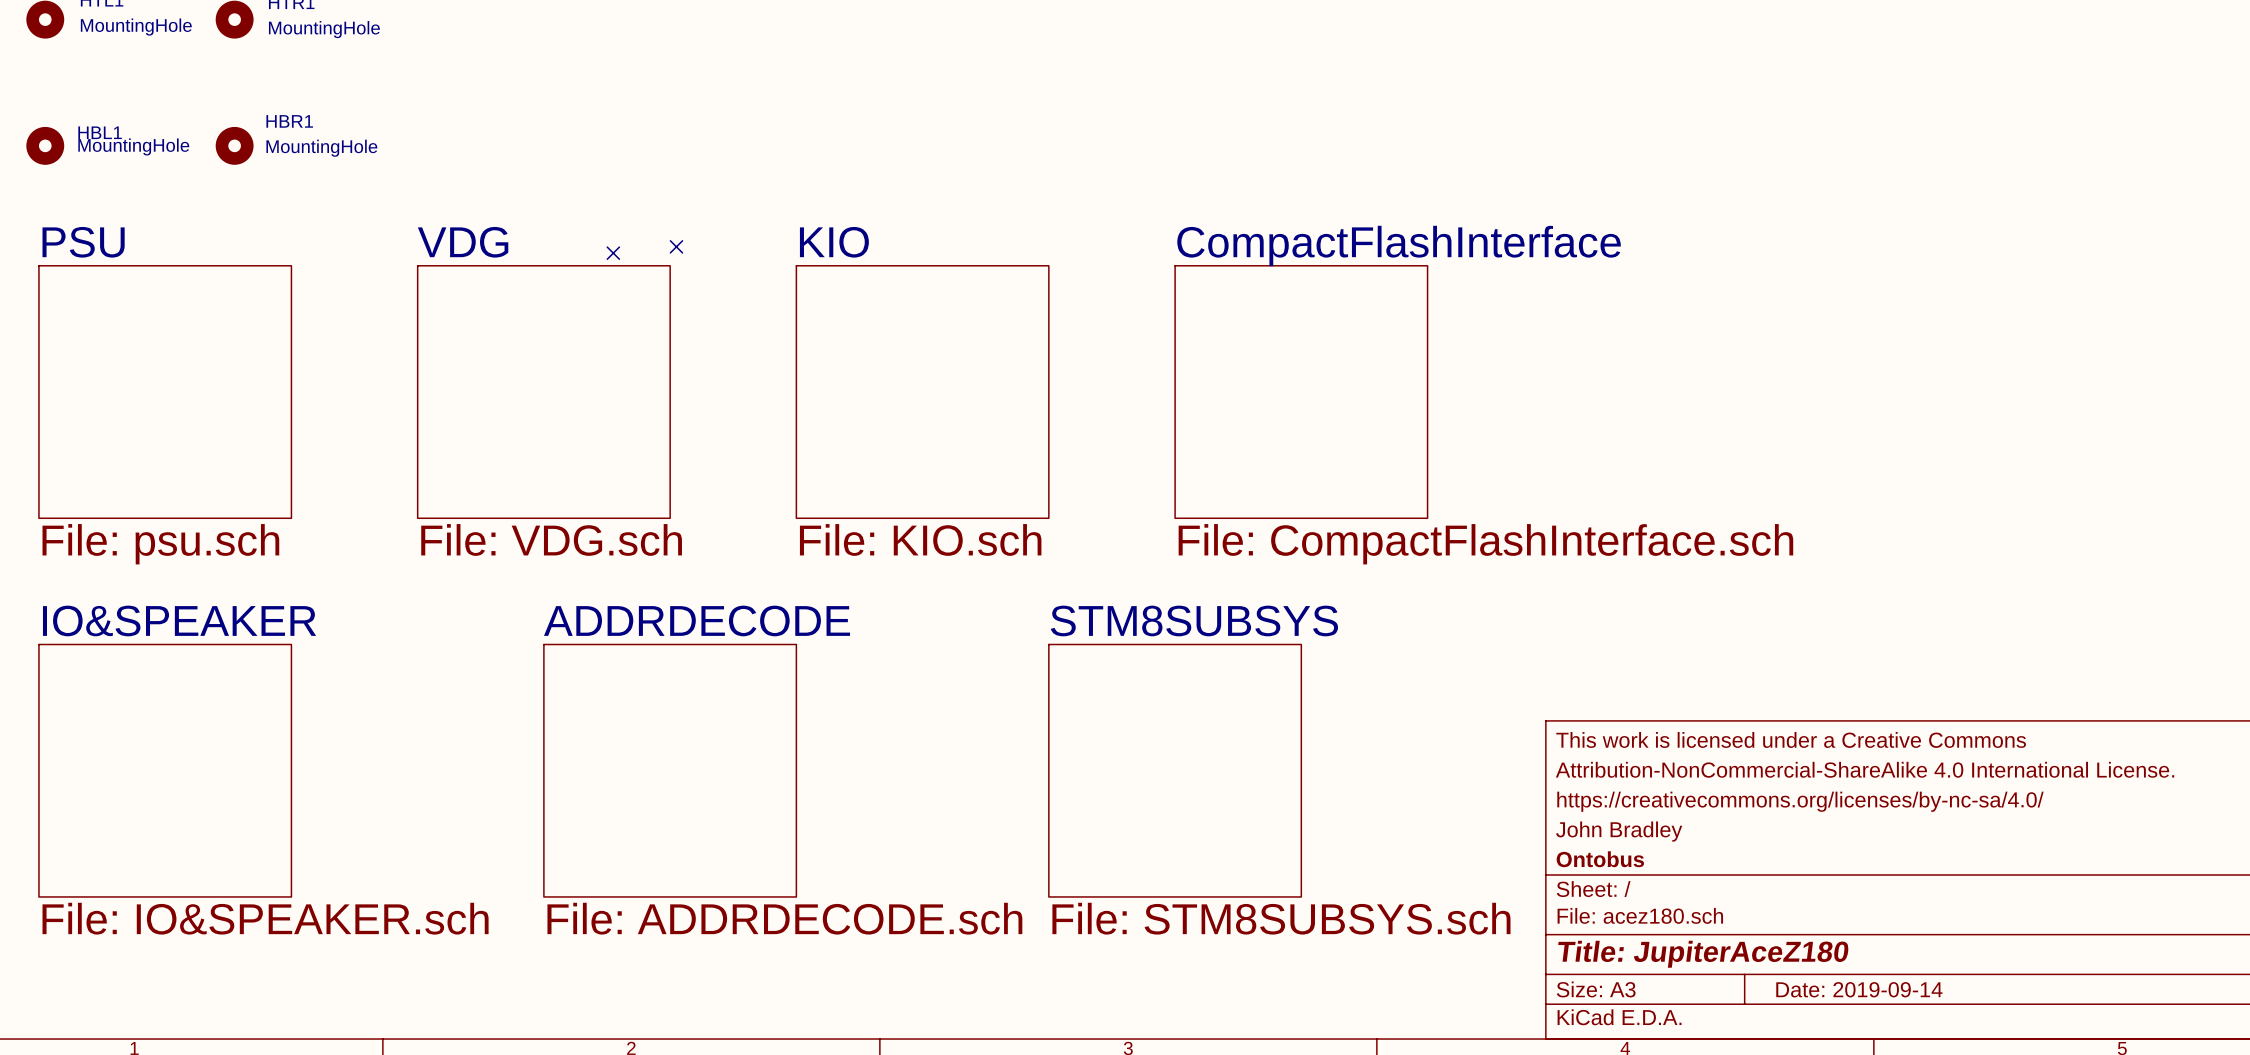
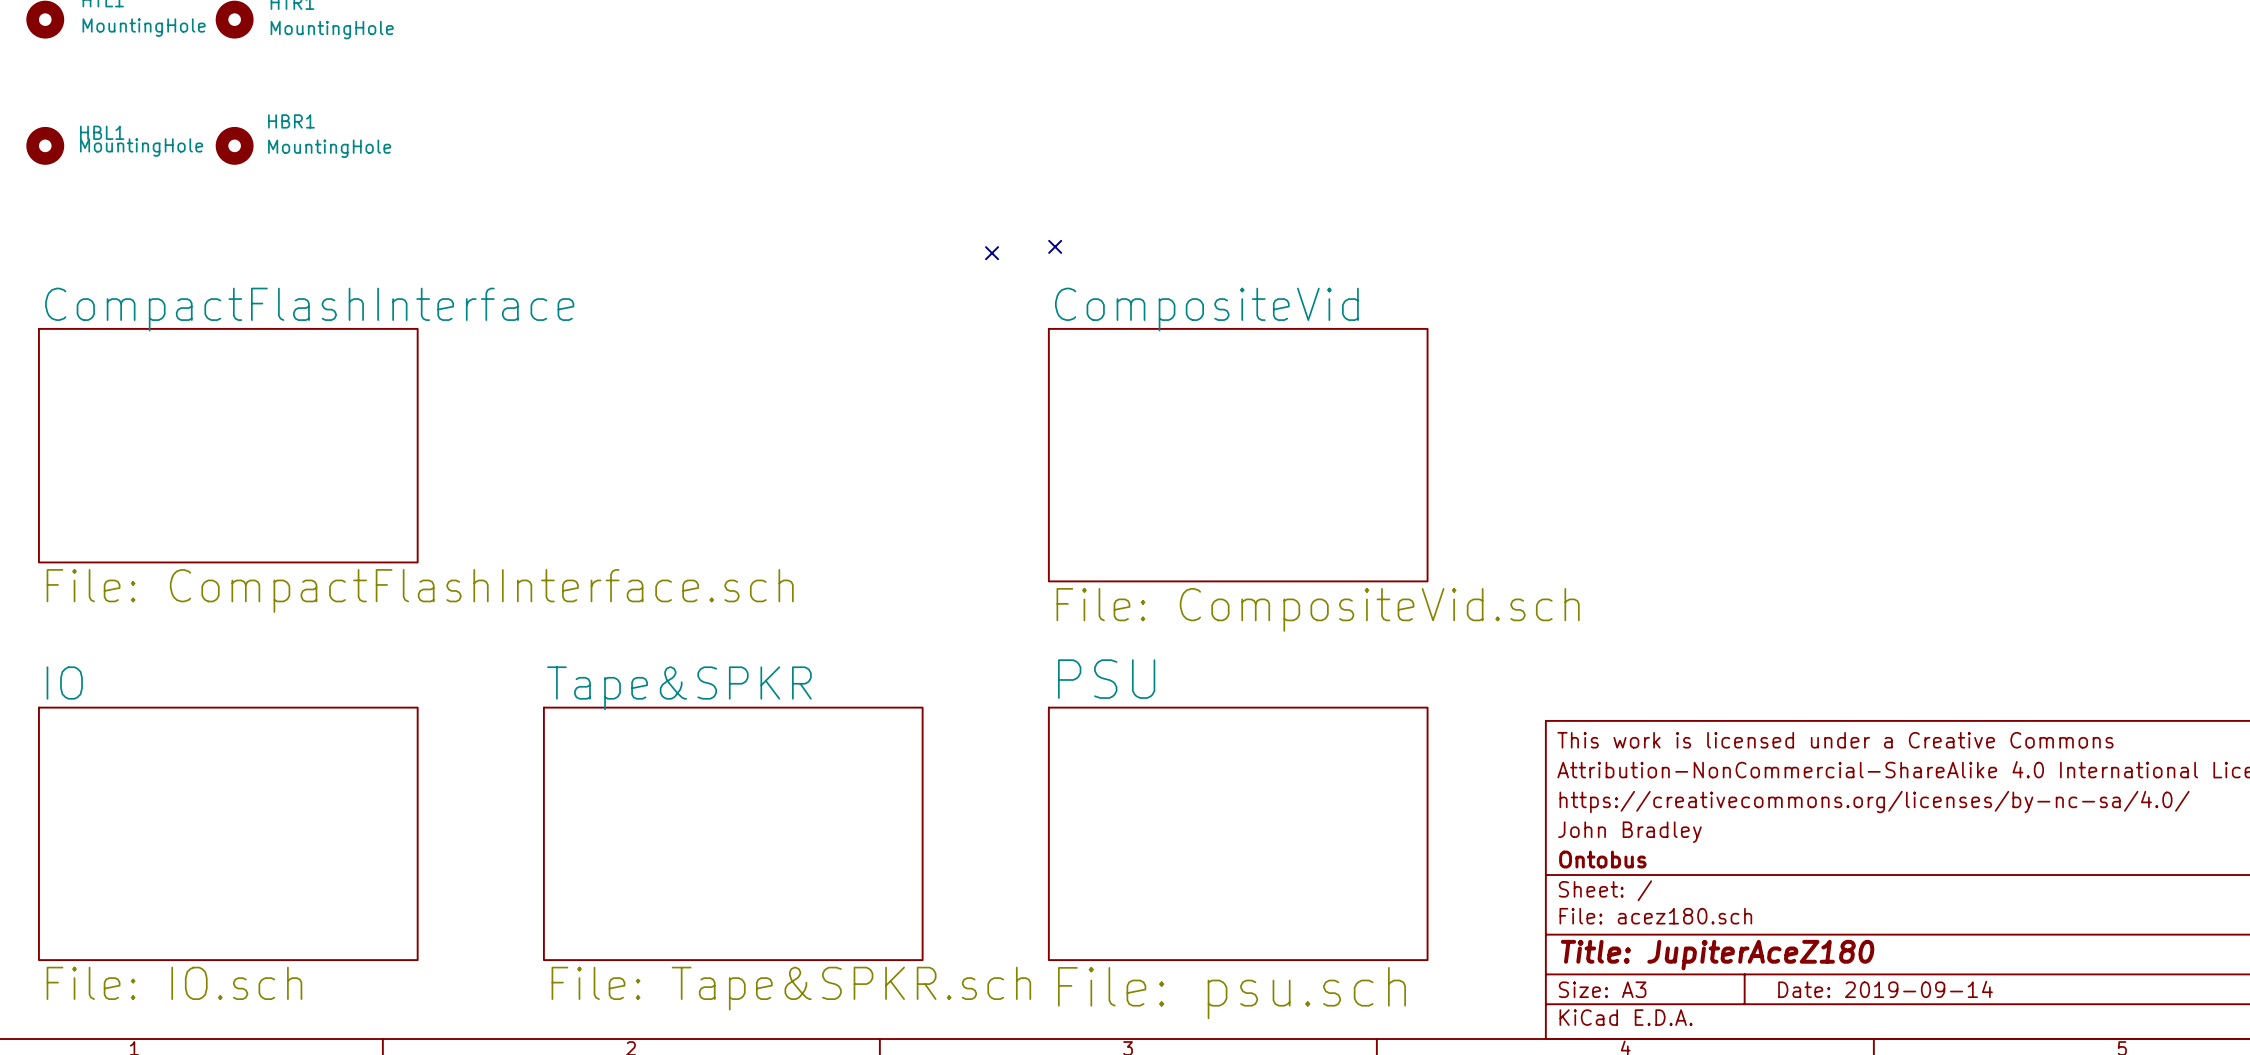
no-connect mark: (676, 246) -> none
no-connect mark: none -> (1055, 246)
no-connect mark: (613, 253) -> none
no-connect mark: none -> (992, 253)
sheet PSU: File: psu.sch (165, 392) -> none
sheet VDG: File: VDG.sch (543, 392) -> none
sheet KIO: File: KIO.sch (922, 392) -> none
sheet CompactFlashInterface: File: CompactFlashInterface.sch (1301, 392) -> none
sheet CompactFlashInterface: none -> File: CompactFlashInterface.sch (228, 445)
sheet CompositeVid: none -> File: CompositeVid.sch (1238, 455)
sheet IO&SPEAKER: File: IO&SPEAKER.sch (165, 770) -> none
sheet ADDRDECODE: File: ADDRDECODE.sch (670, 770) -> none
sheet STM8SUBSYS: File: STM8SUBSYS.sch (1175, 770) -> none
sheet IO: none -> File: IO.sch (228, 833)
sheet Tape&SPKR: none -> File: Tape&SPKR.sch (733, 833)
sheet PSU: none -> File: psu.sch (1238, 833)

